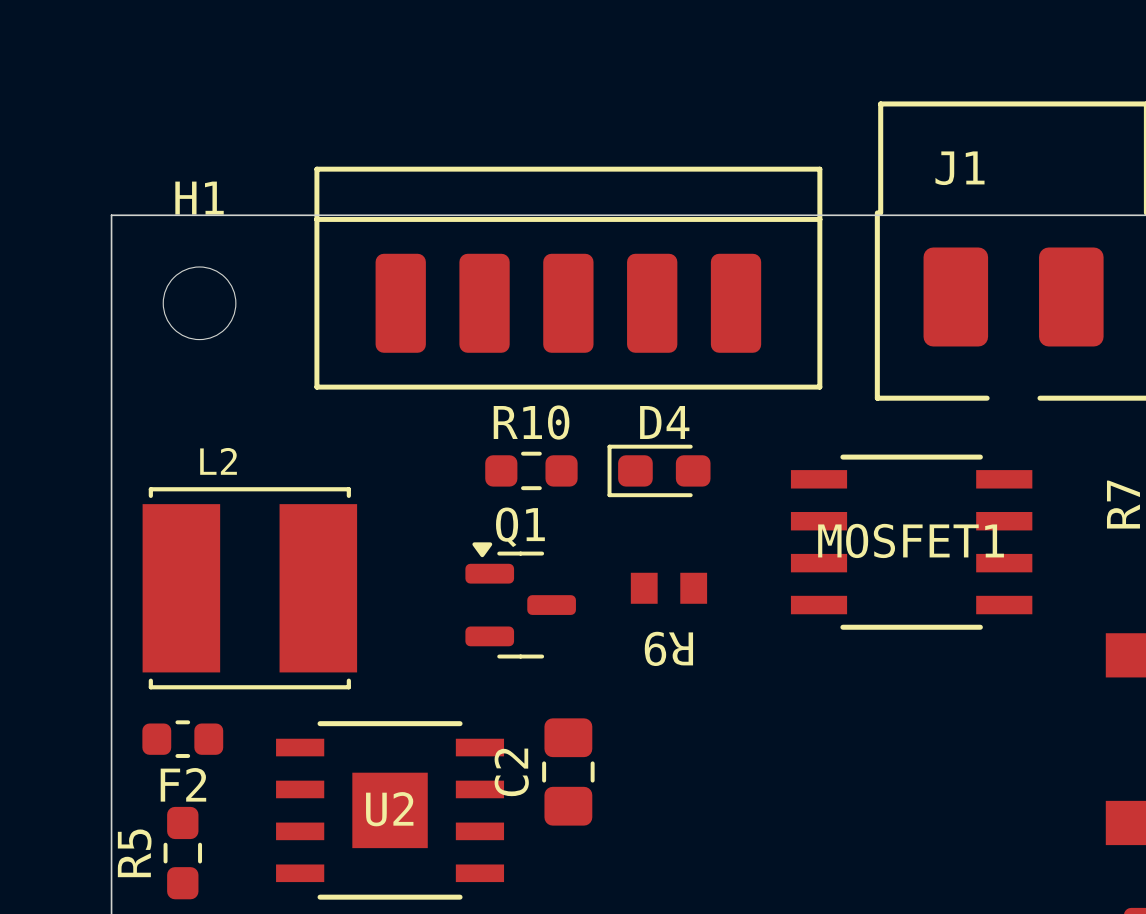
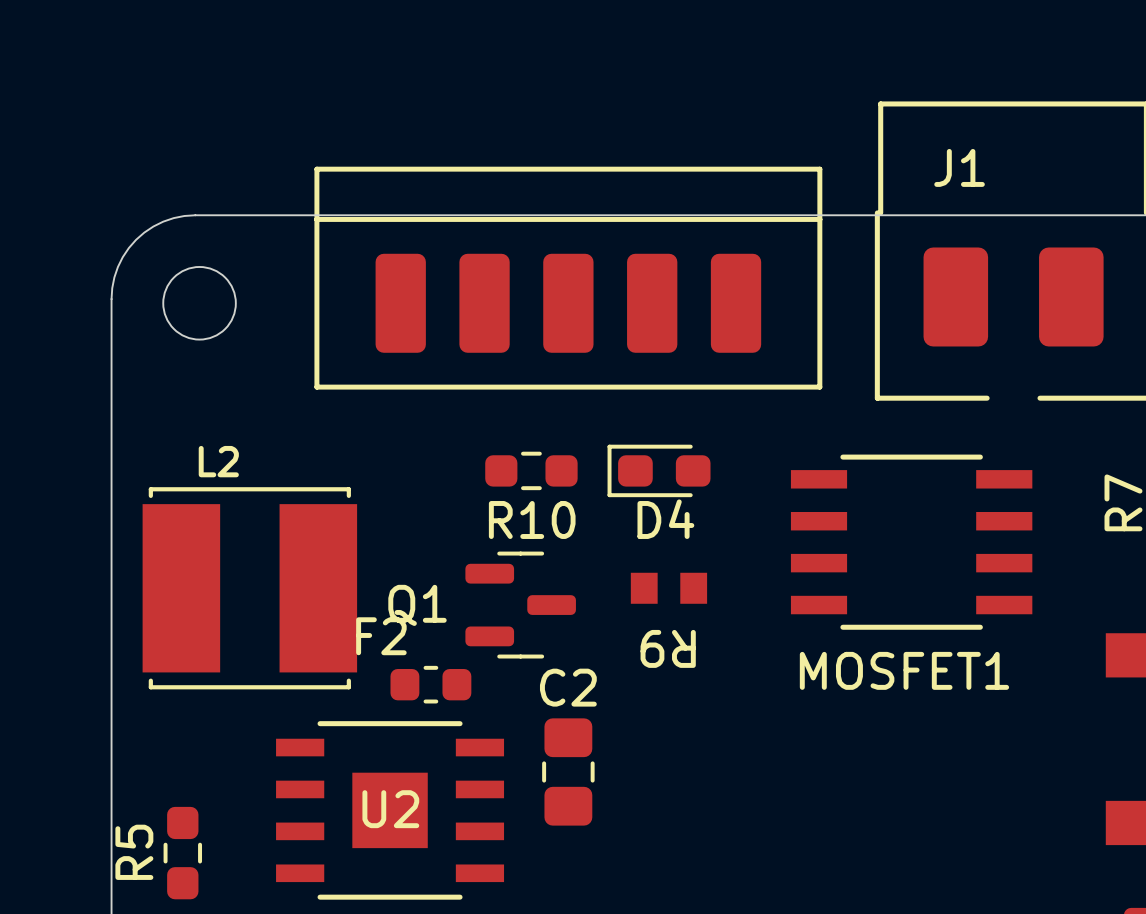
H1 name: H1 (199, 198) -> none
board edge: (195, 215) (111, 215) (111, 299) -> (195, 215) (163, 221) (136, 239) (117, 267) (111, 299)
R10 name position: R10 (531, 422) -> R10 (532, 519)
D4 name position: D4 (664, 422) -> D4 (665, 519)
Q1 name position: Q1 (520, 527) -> Q1 (417, 605)
MOSFET1 name position: MOSFET1 (911, 540) -> MOSFET1 (904, 670)
Q1 footprint: [465, 542, 576, 659] -> [465, 551, 576, 659]
F2 position: (182, 739) -> (430, 684)
C2 name rotation: 0° (511, 772) -> 90° clockwise (568, 687)
C2 name position: C2 (511, 772) -> C2 (568, 687)
F2 name position: F2 (183, 784) -> F2 (381, 636)

